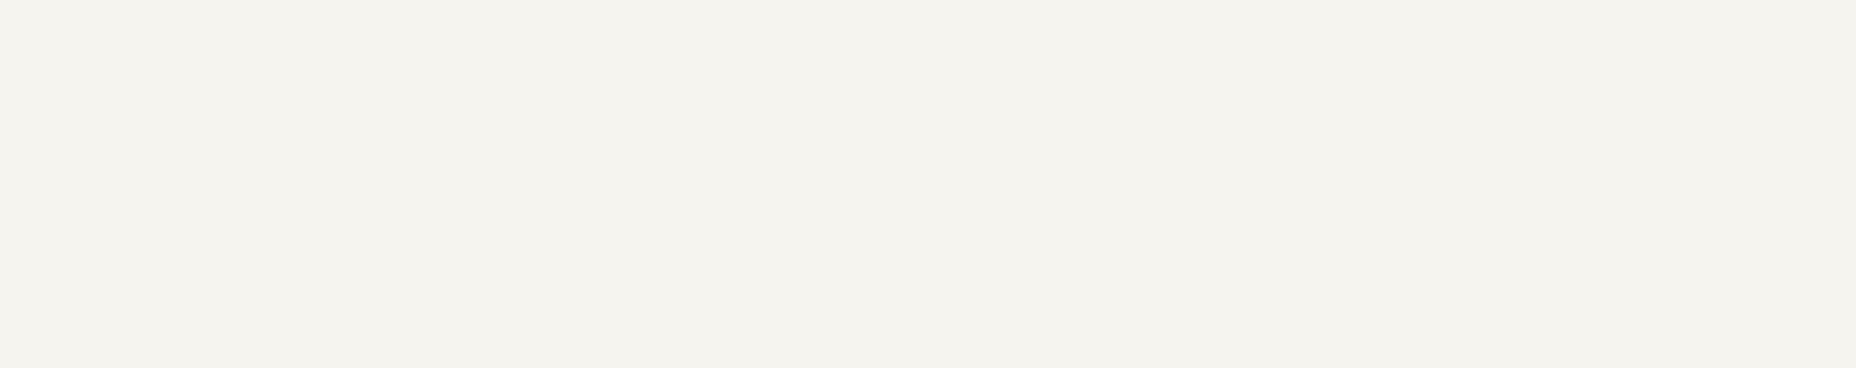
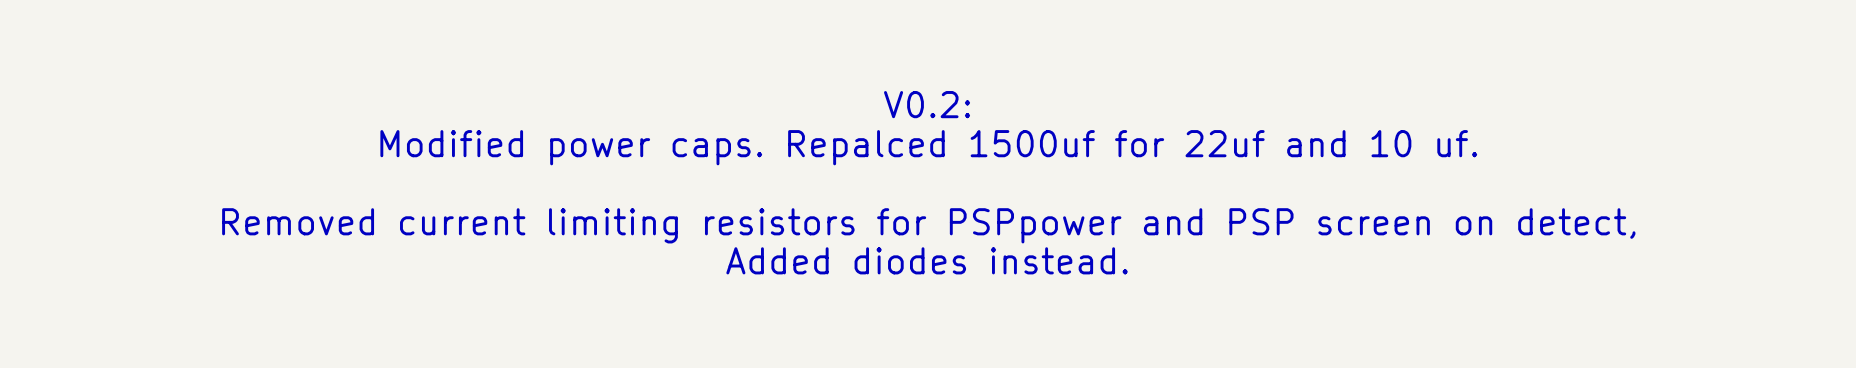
text: none -> V0.2: (927, 104)
text: none -> Modified power caps. Repalced 1500uf for 22uf and 10 uf. (928, 147)
text: none -> Removed current limiting resistors for PSPpower and PSP screen on detect, (928, 225)
text: none -> Added diodes instead. (927, 260)

